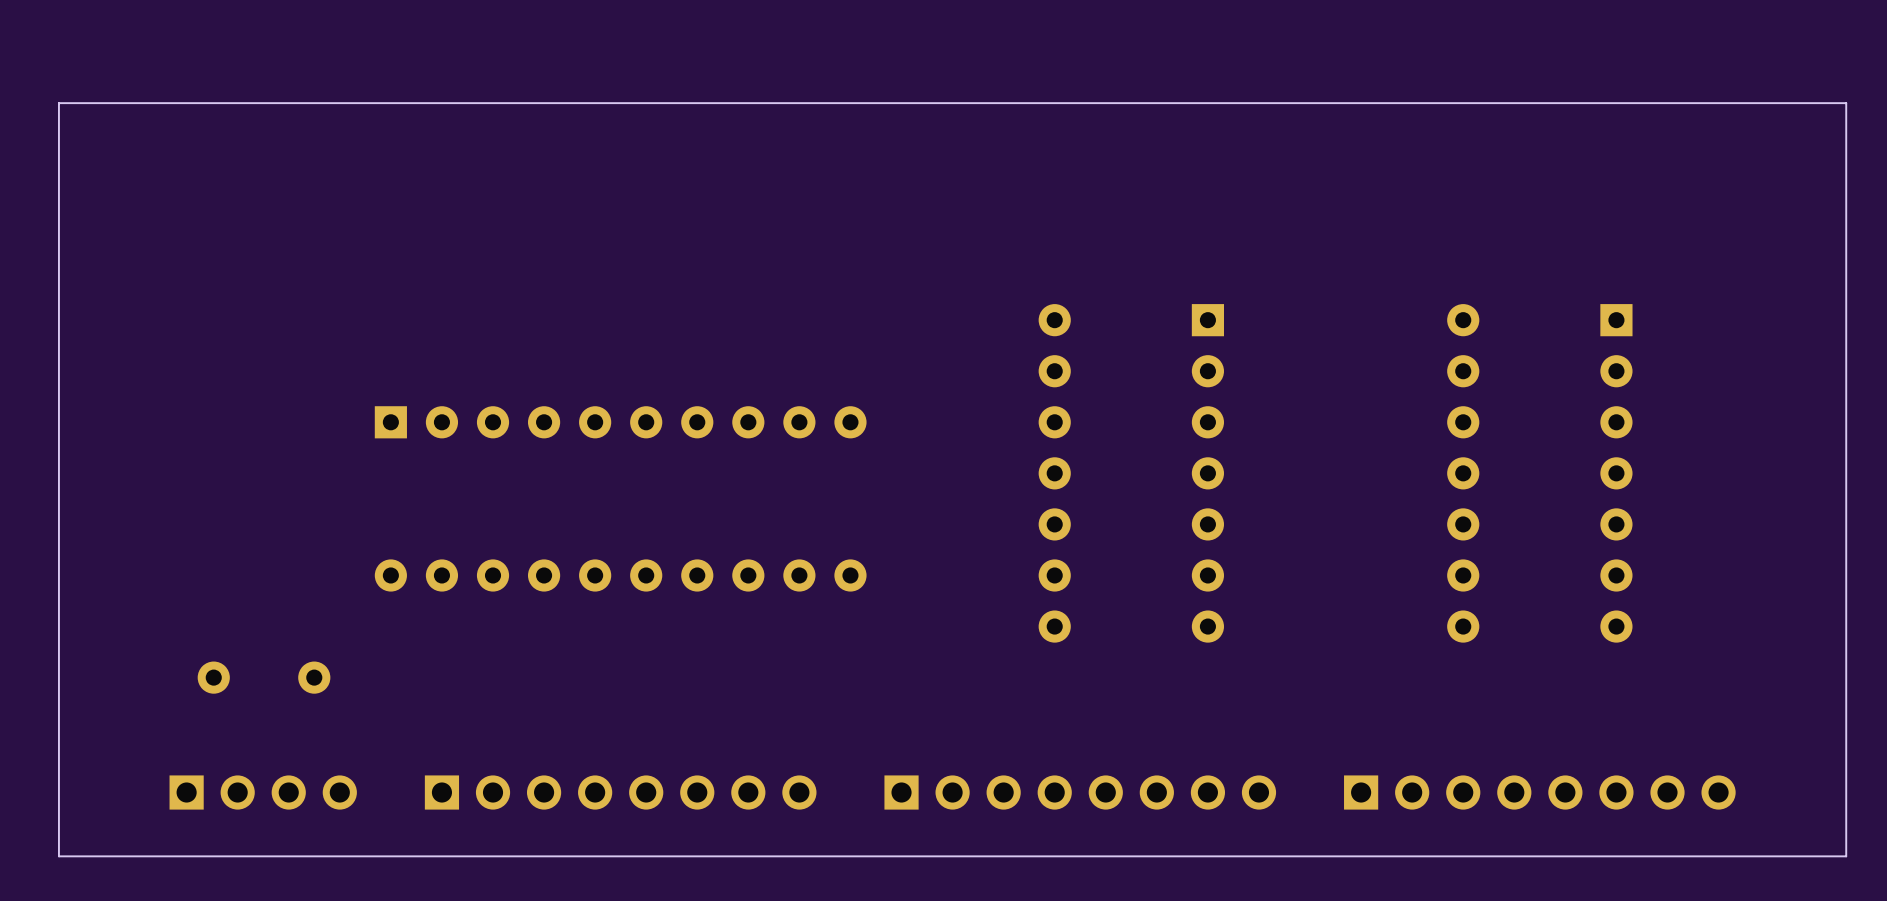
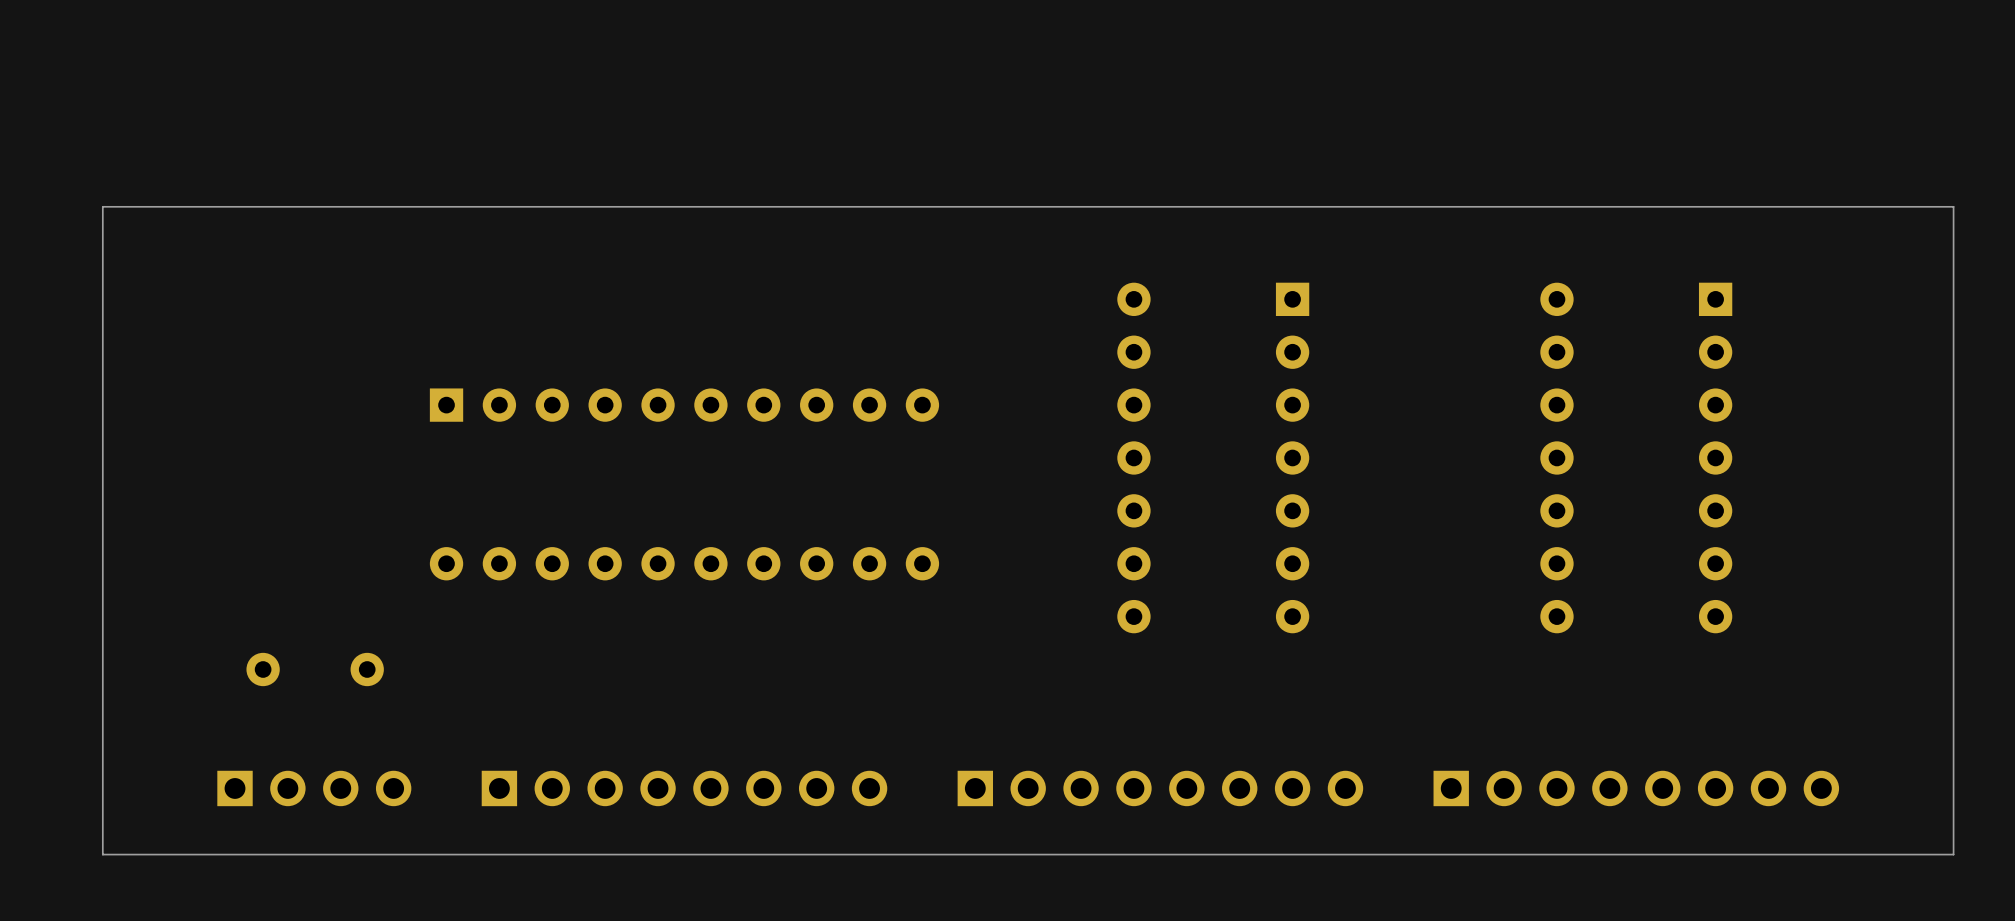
board edge: (1846, 230) (1846, 103) (58, 103) (58, 230) -> (1953, 206) (102, 206)

